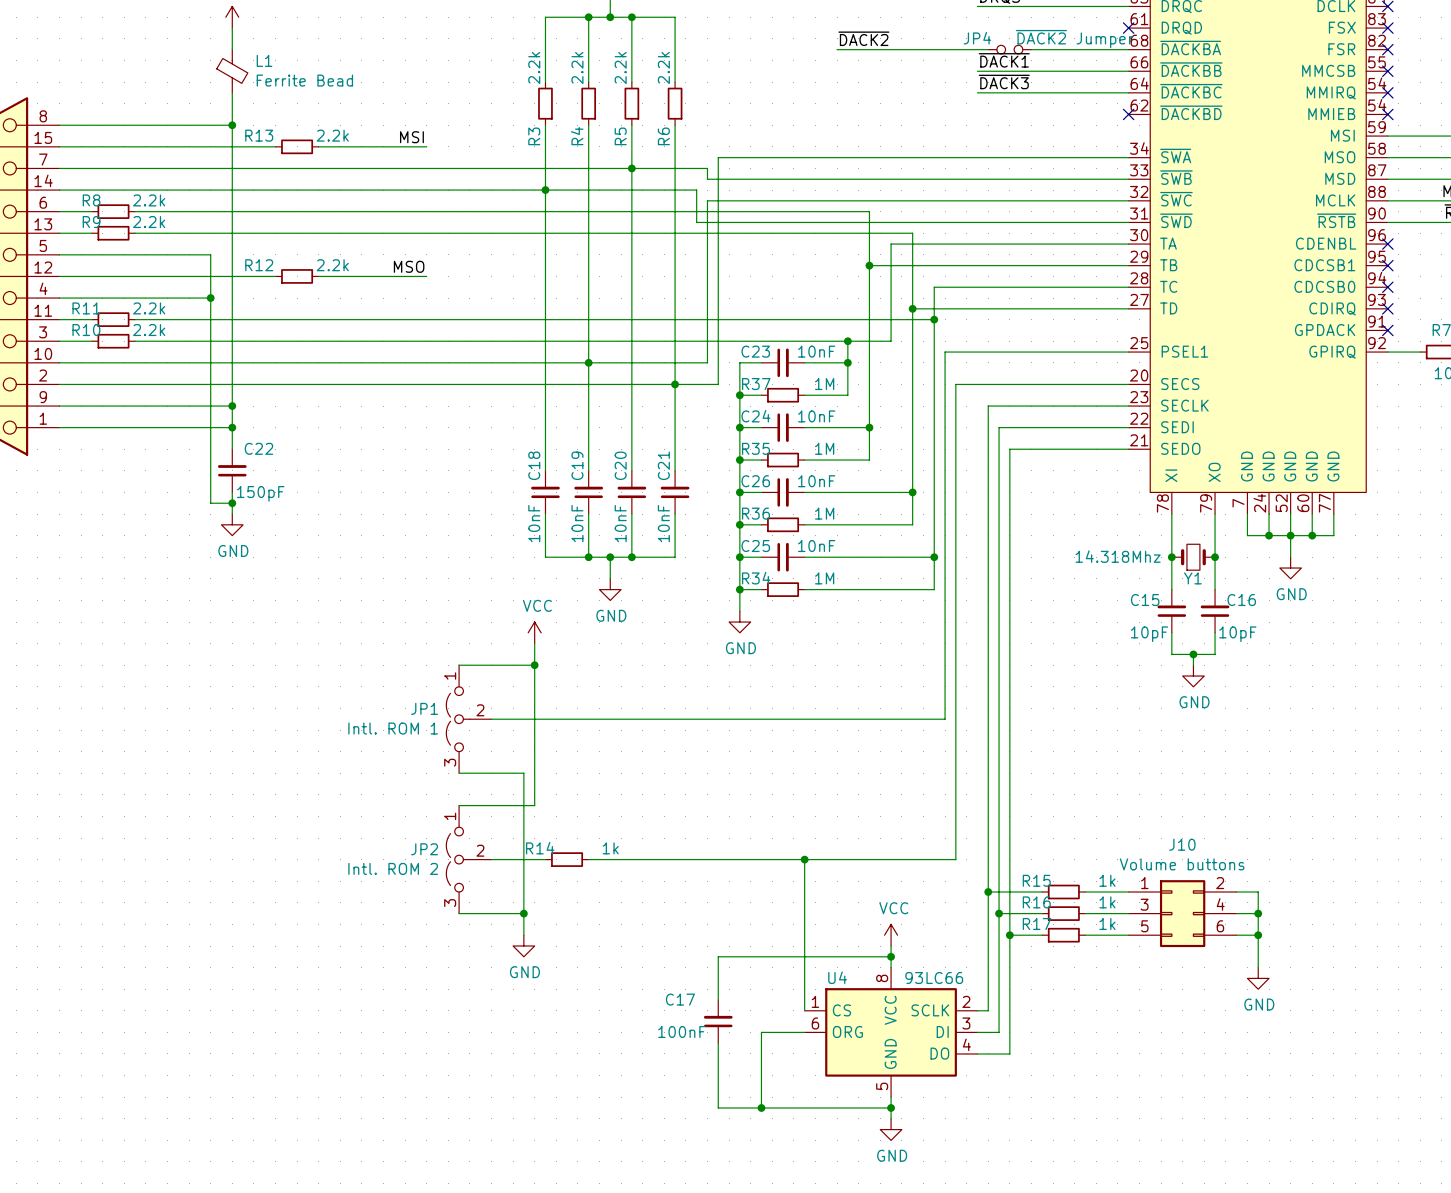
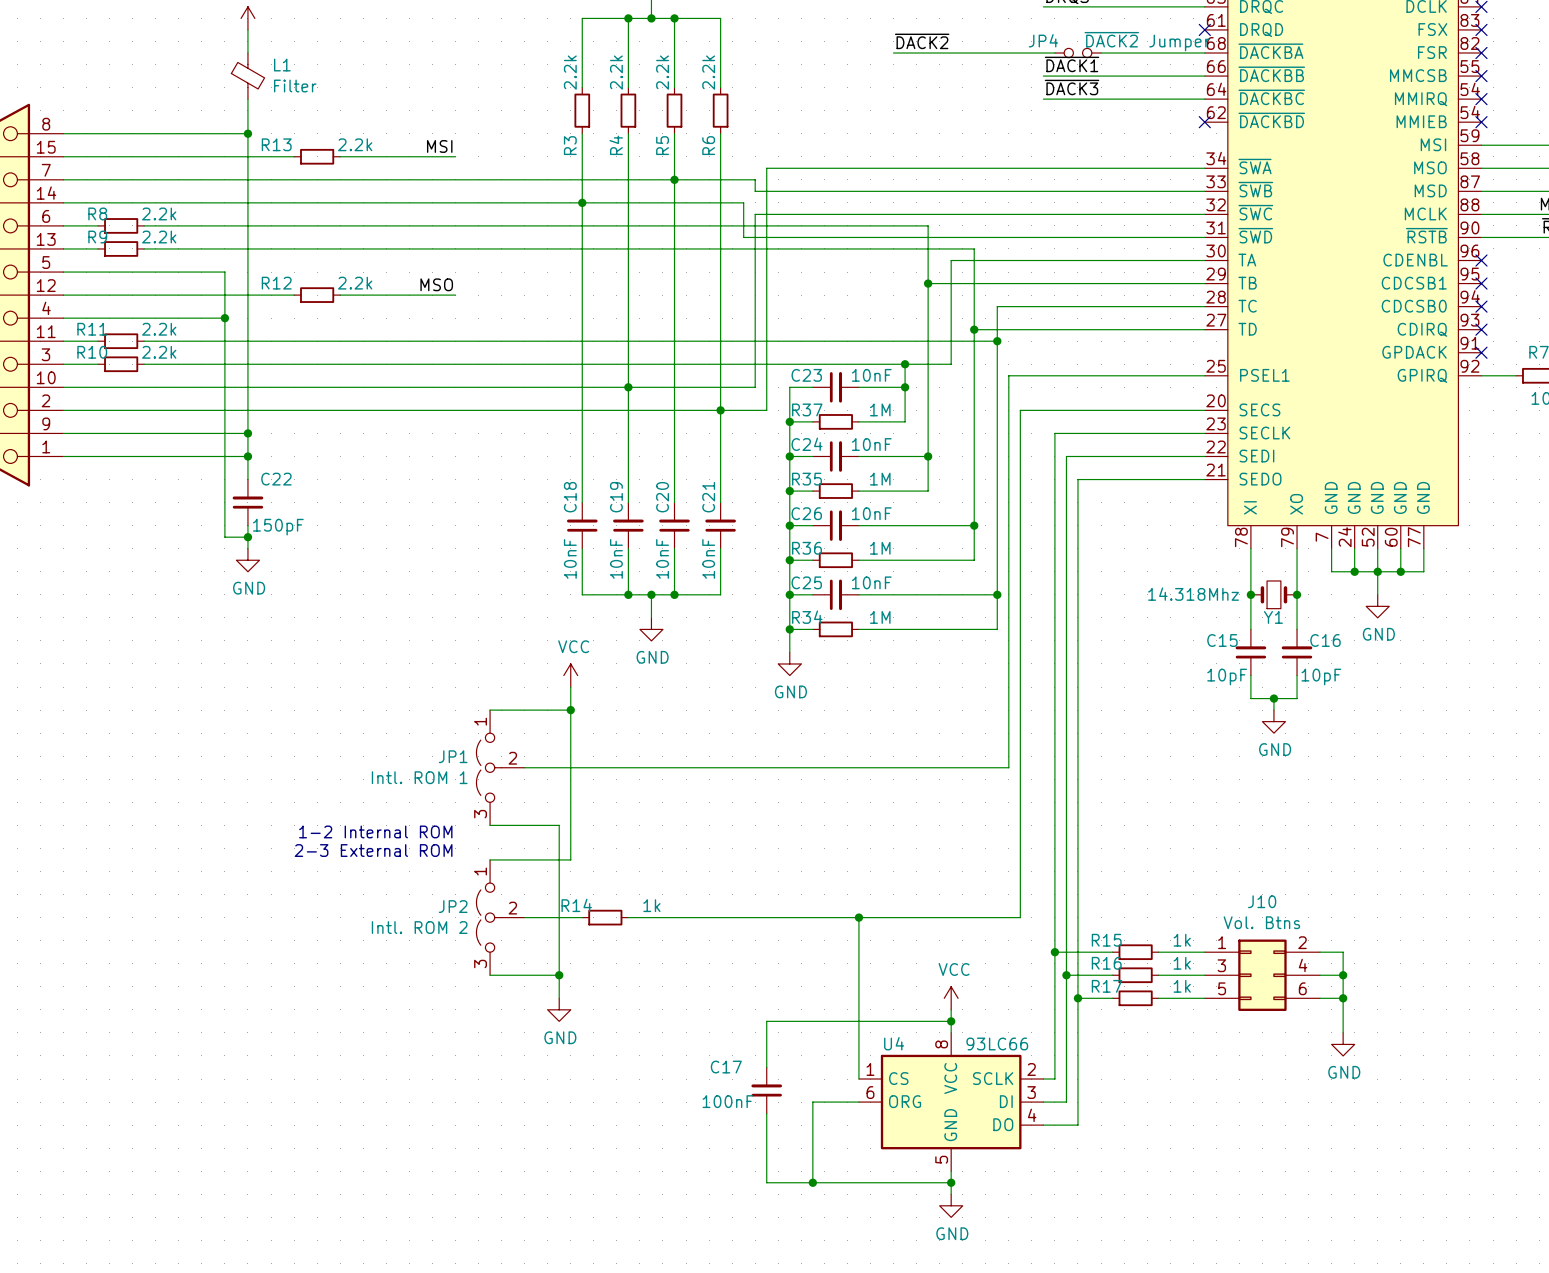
L1 value: Ferrite Bead (304, 80) -> Filter (295, 86)
text: none -> 1-2 Internal ROM (375, 831)
text: none -> 2-3 External ROM (373, 850)
J10 value: Volume buttons (1182, 864) -> Vol. Btns (1261, 922)

